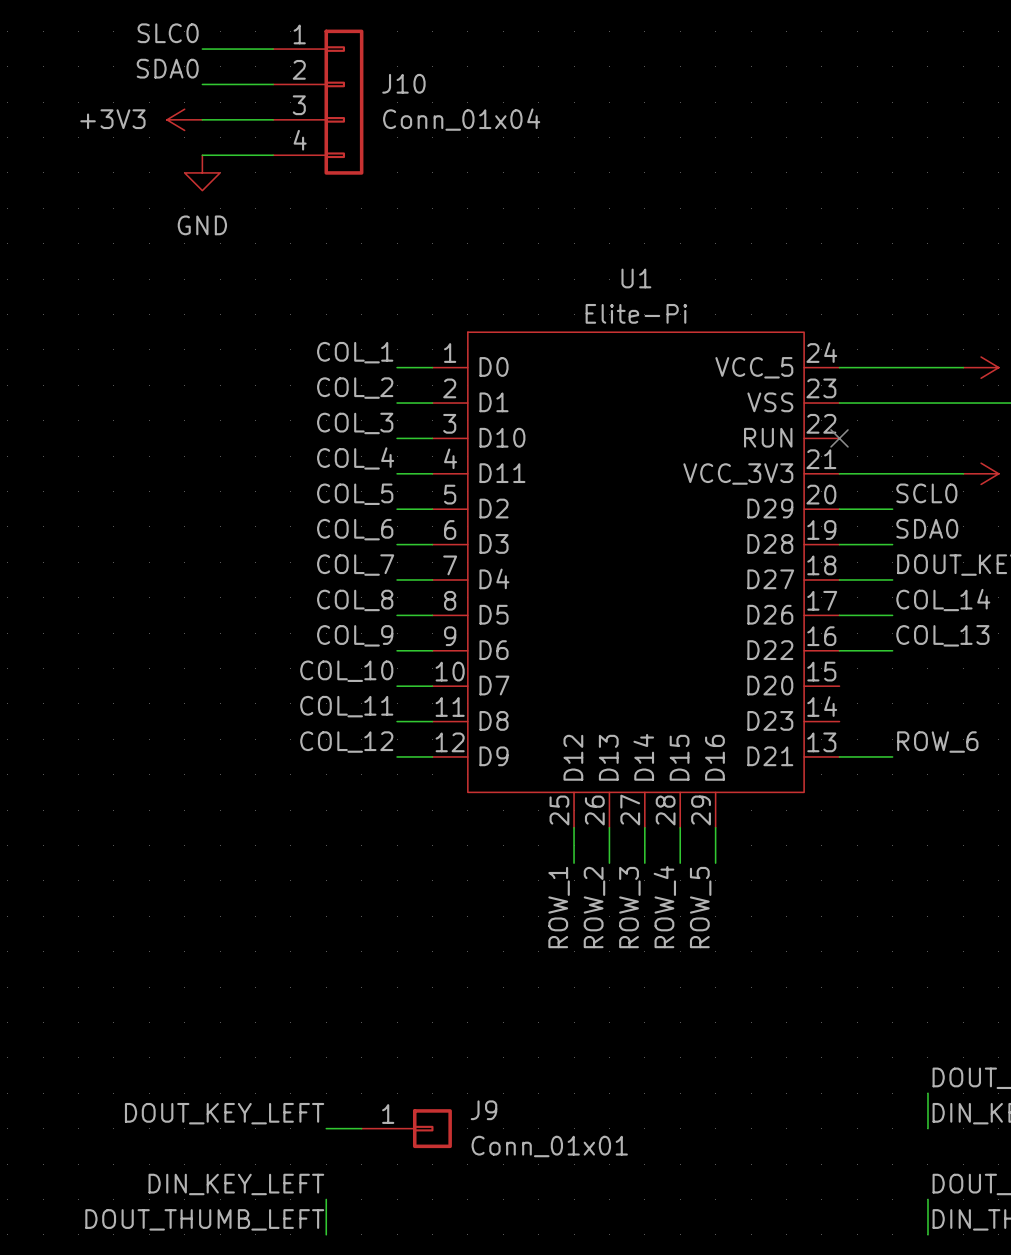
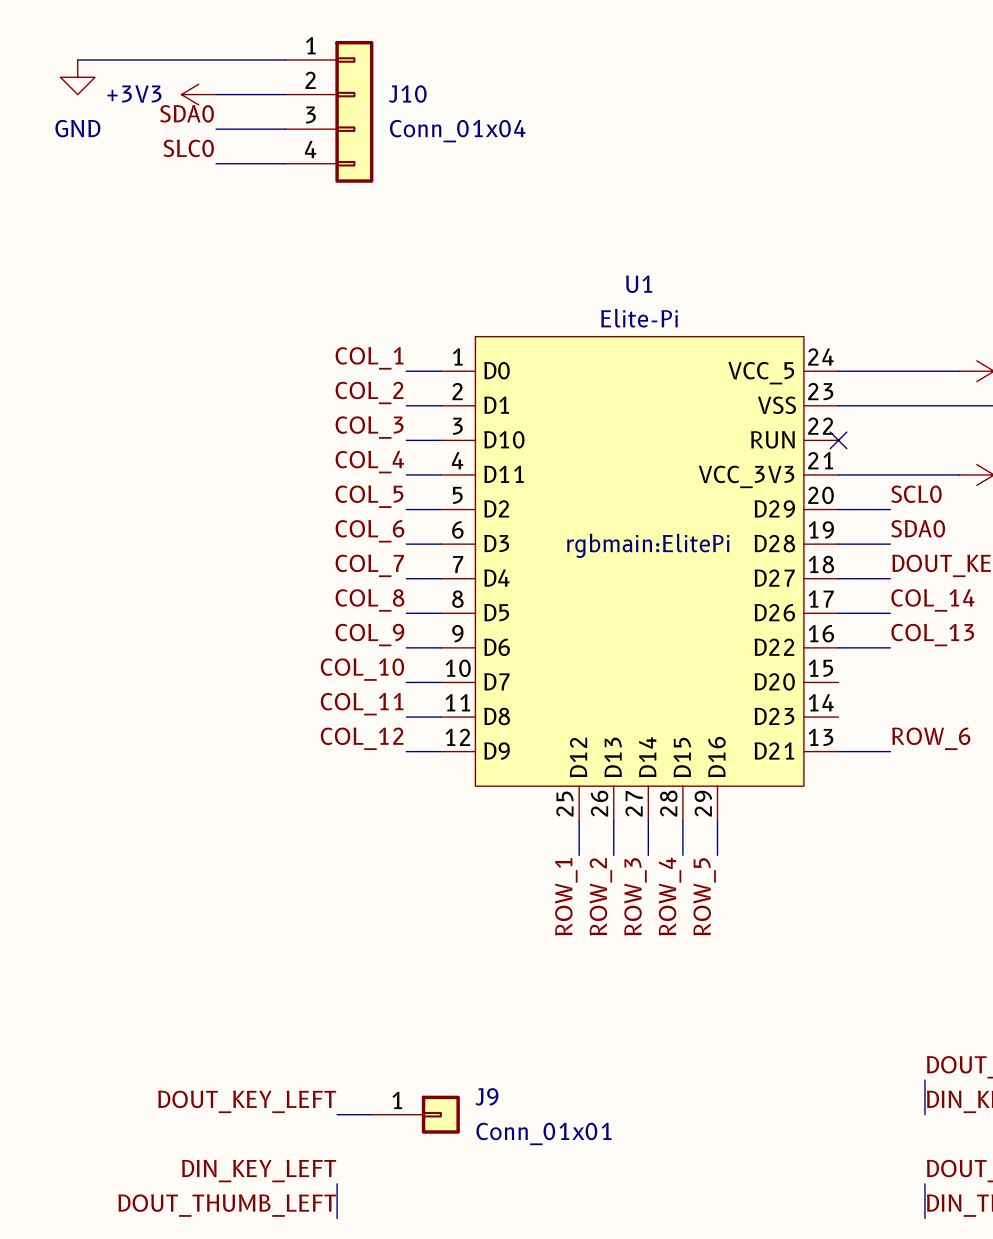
label position: SLC0 (168, 33) -> SLC0 (188, 148)
wire: none -> (77, 60) (216, 60)
label position: SDA0 (167, 68) -> SDA0 (187, 113)
power symbol position: +3V3 (184, 119) -> +3V3 (198, 94)
power symbol position: GND (202, 172) -> GND (77, 77)
U1 text: none -> rgbmain:ElitePi (648, 545)

